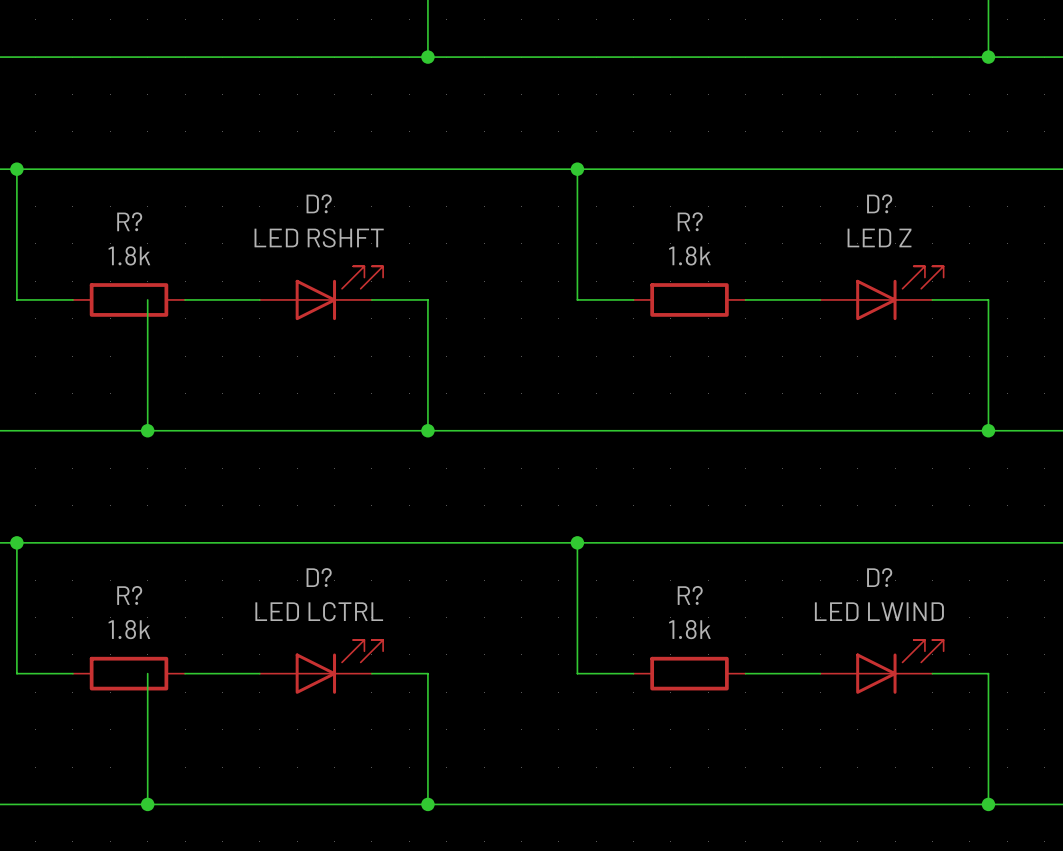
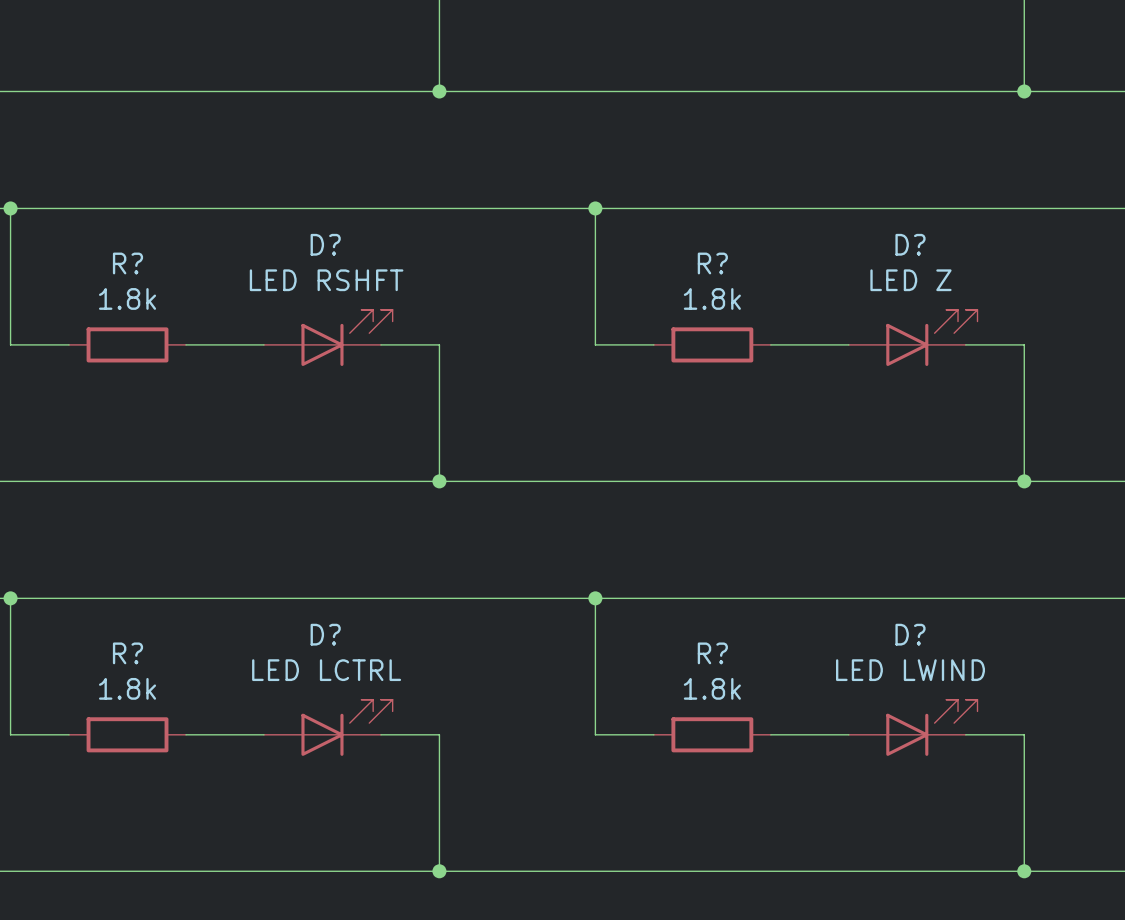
wire: (147, 299) (147, 430) -> none
junction: (147, 430) -> none
wire: (147, 673) (147, 804) -> none
junction: (147, 804) -> none

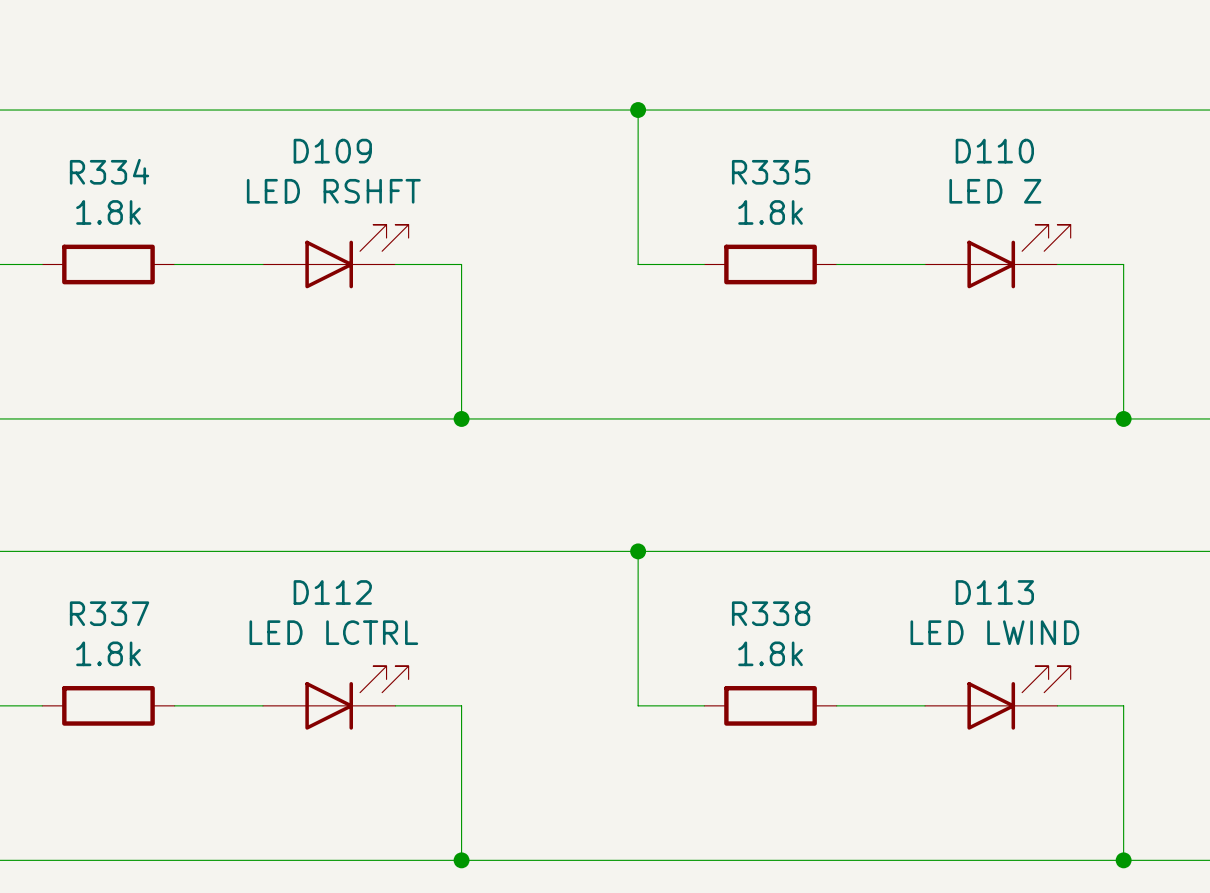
D? name: D? (325, 244) -> D109 (332, 151)
D? name: D? (910, 244) -> D110 (994, 151)
R? name: R? (127, 263) -> R334 (109, 171)
R? name: R? (712, 263) -> R335 (771, 172)
D? name: D? (325, 634) -> D112 (332, 592)
D? name: D? (910, 634) -> D113 (994, 592)
R? name: R? (127, 653) -> R337 (109, 613)
R? name: R? (712, 653) -> R338 (771, 613)

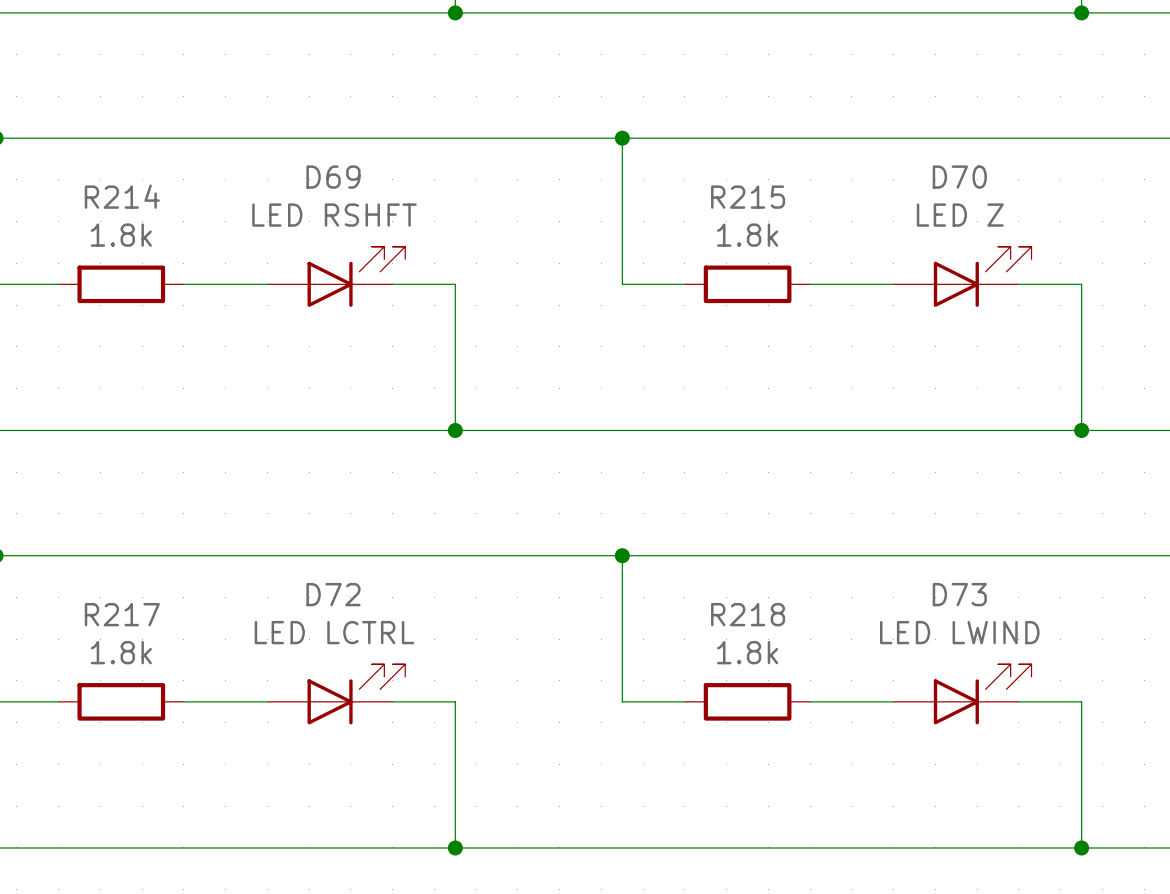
D109 name: D109 (332, 151) -> D69 (333, 177)
D110 name: D110 (994, 151) -> D70 (959, 177)
R334 name: R334 (109, 171) -> R214 (122, 196)
R335 name: R335 (771, 172) -> R215 (748, 197)
D112 name: D112 (332, 592) -> D72 (333, 594)
D113 name: D113 (994, 592) -> D73 (959, 594)
R337 name: R337 (109, 613) -> R217 (122, 614)
R338 name: R338 (771, 613) -> R218 (748, 614)

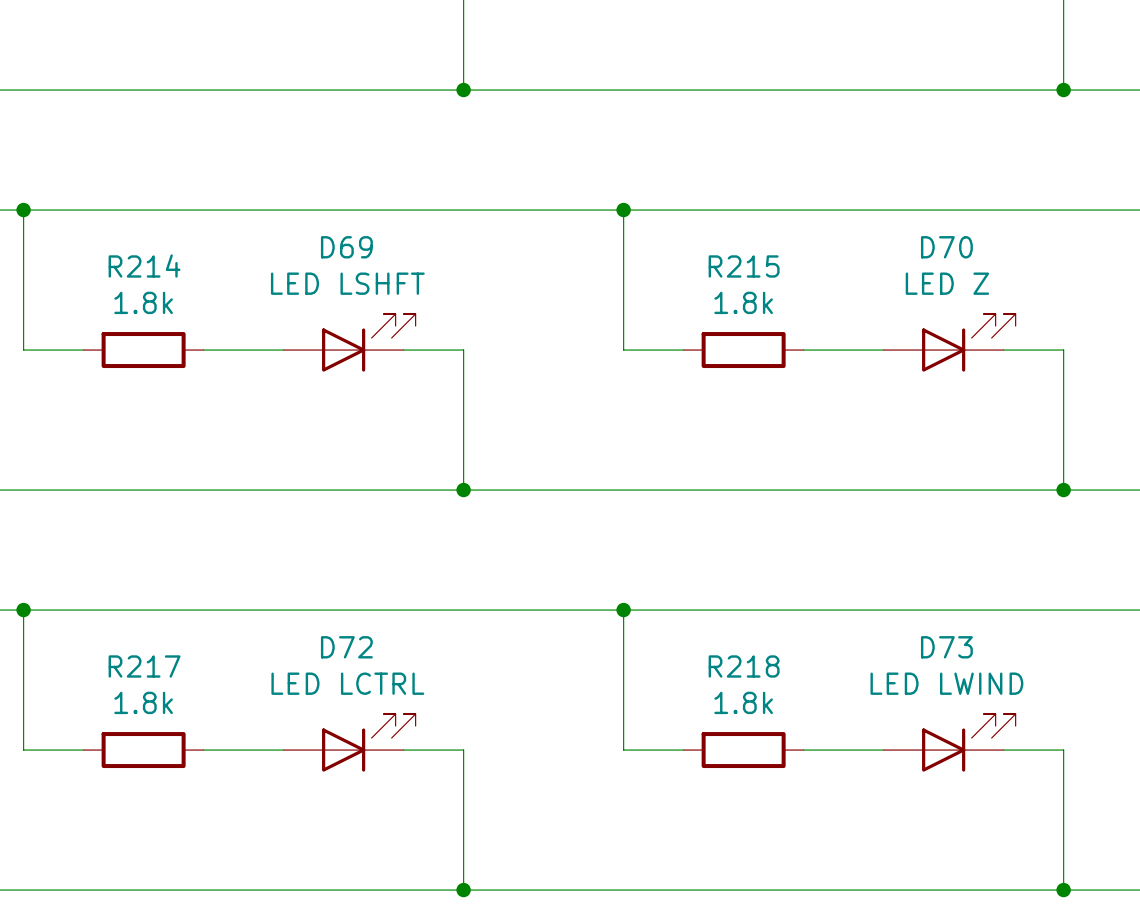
D69 value: LED RSHFT (334, 215) -> LED LSHFT (347, 283)

